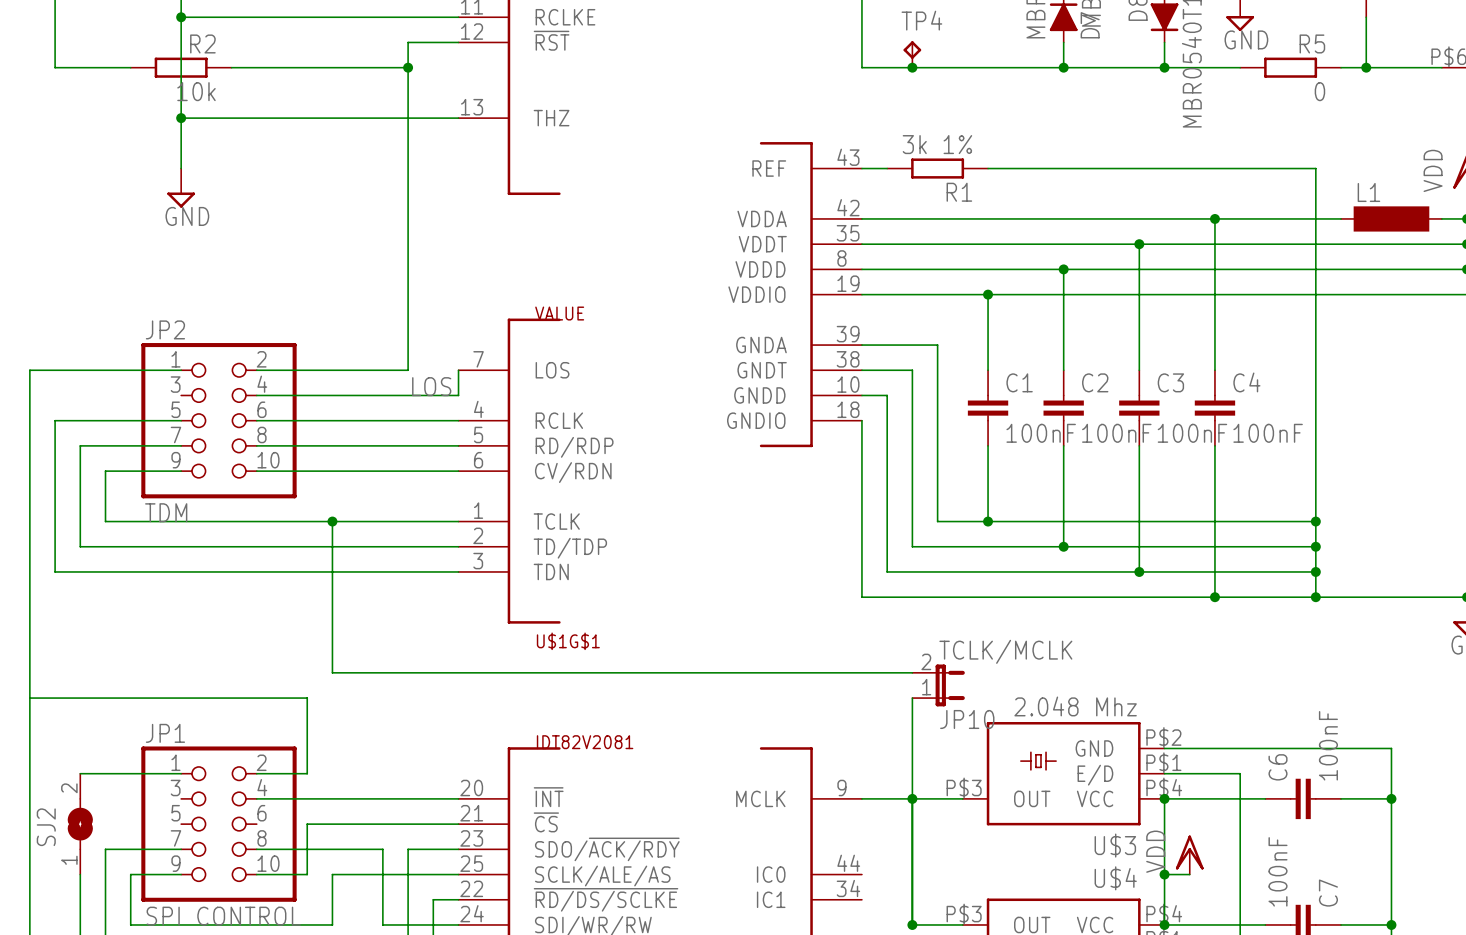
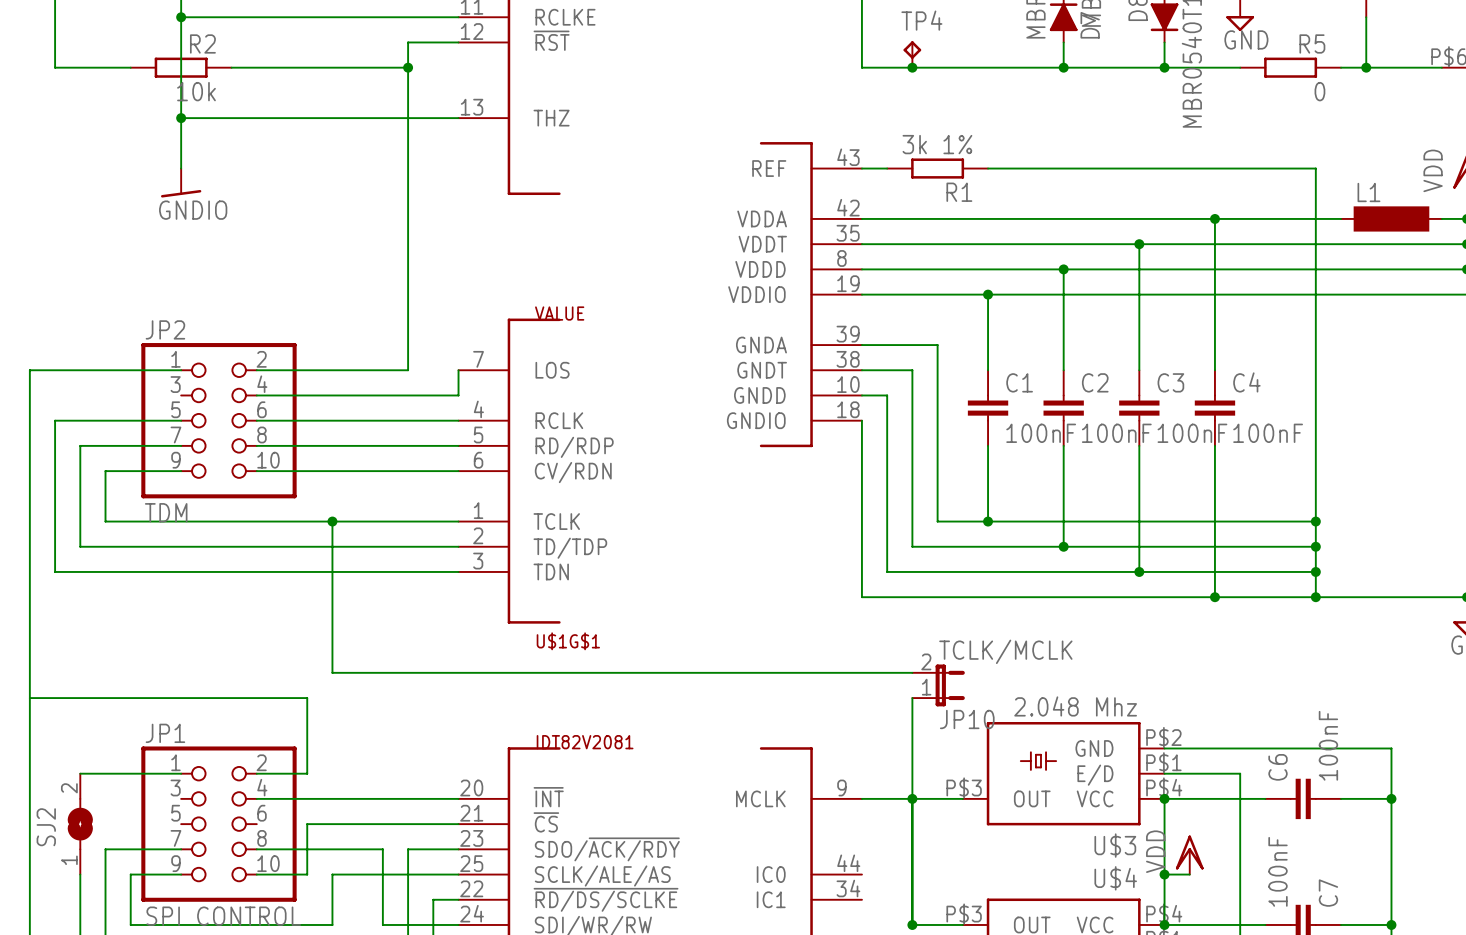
power symbol: GND (181, 188) -> GNDIO (181, 183)
label: LOS (431, 386) -> none

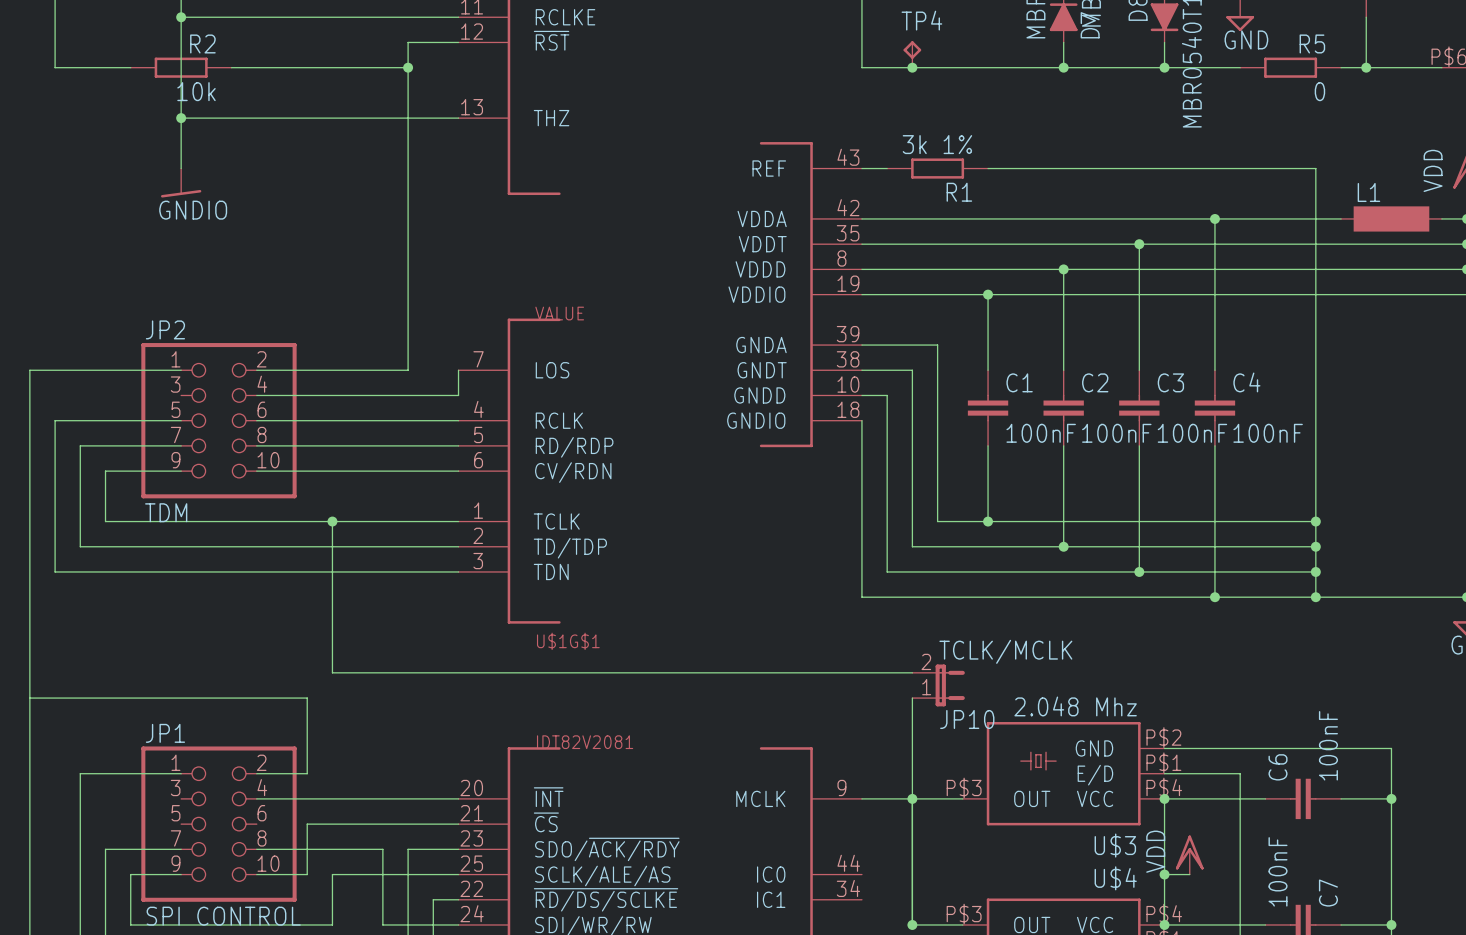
SJ2: (80, 824) -> none

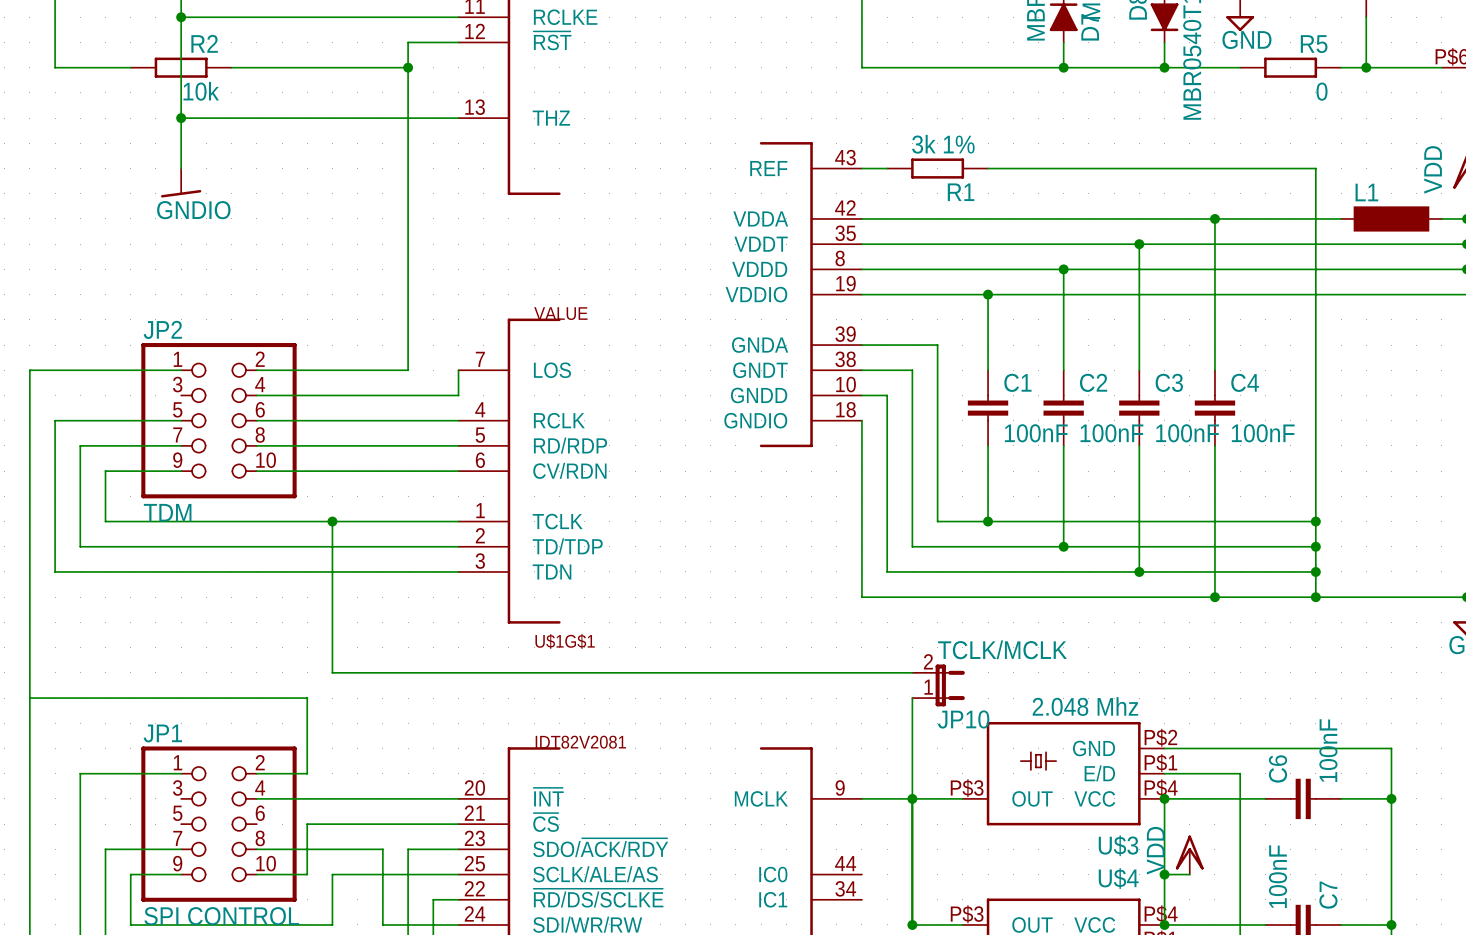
TP4: (912, 54) -> none
junction: (912, 67) -> none

